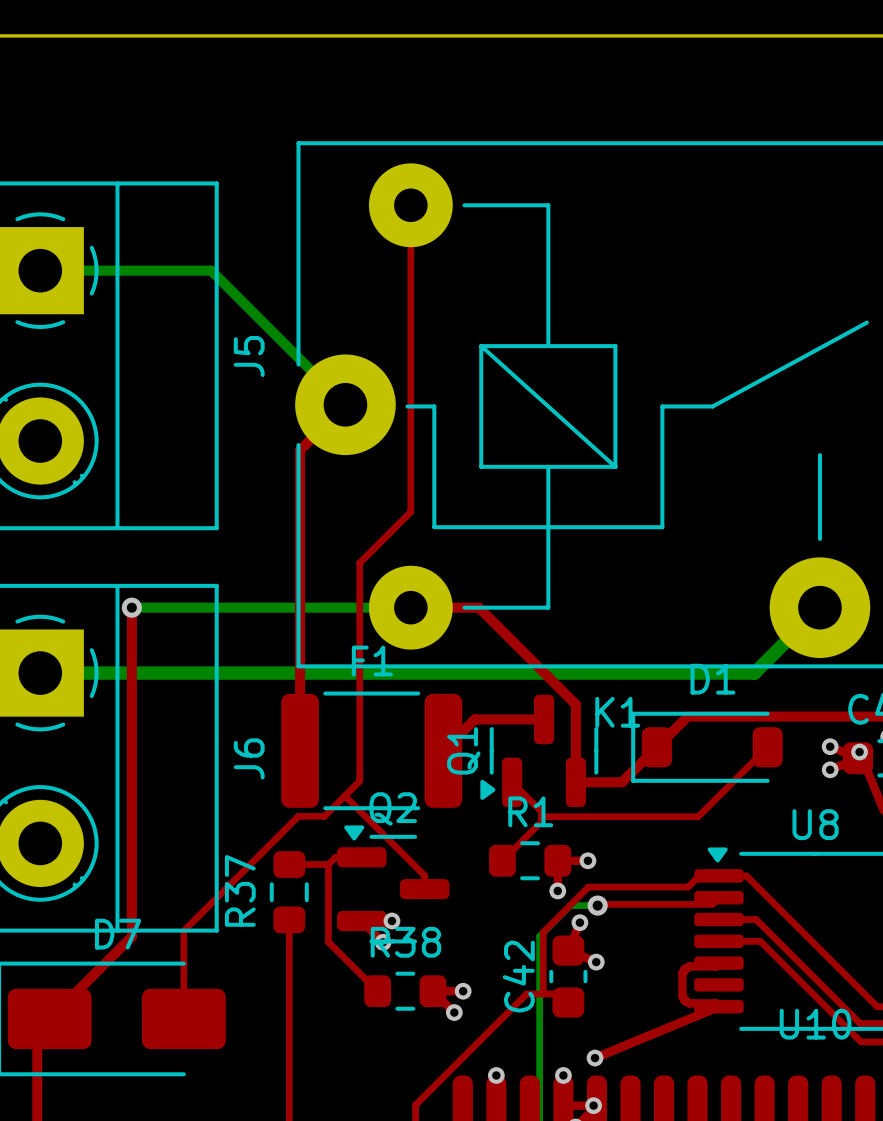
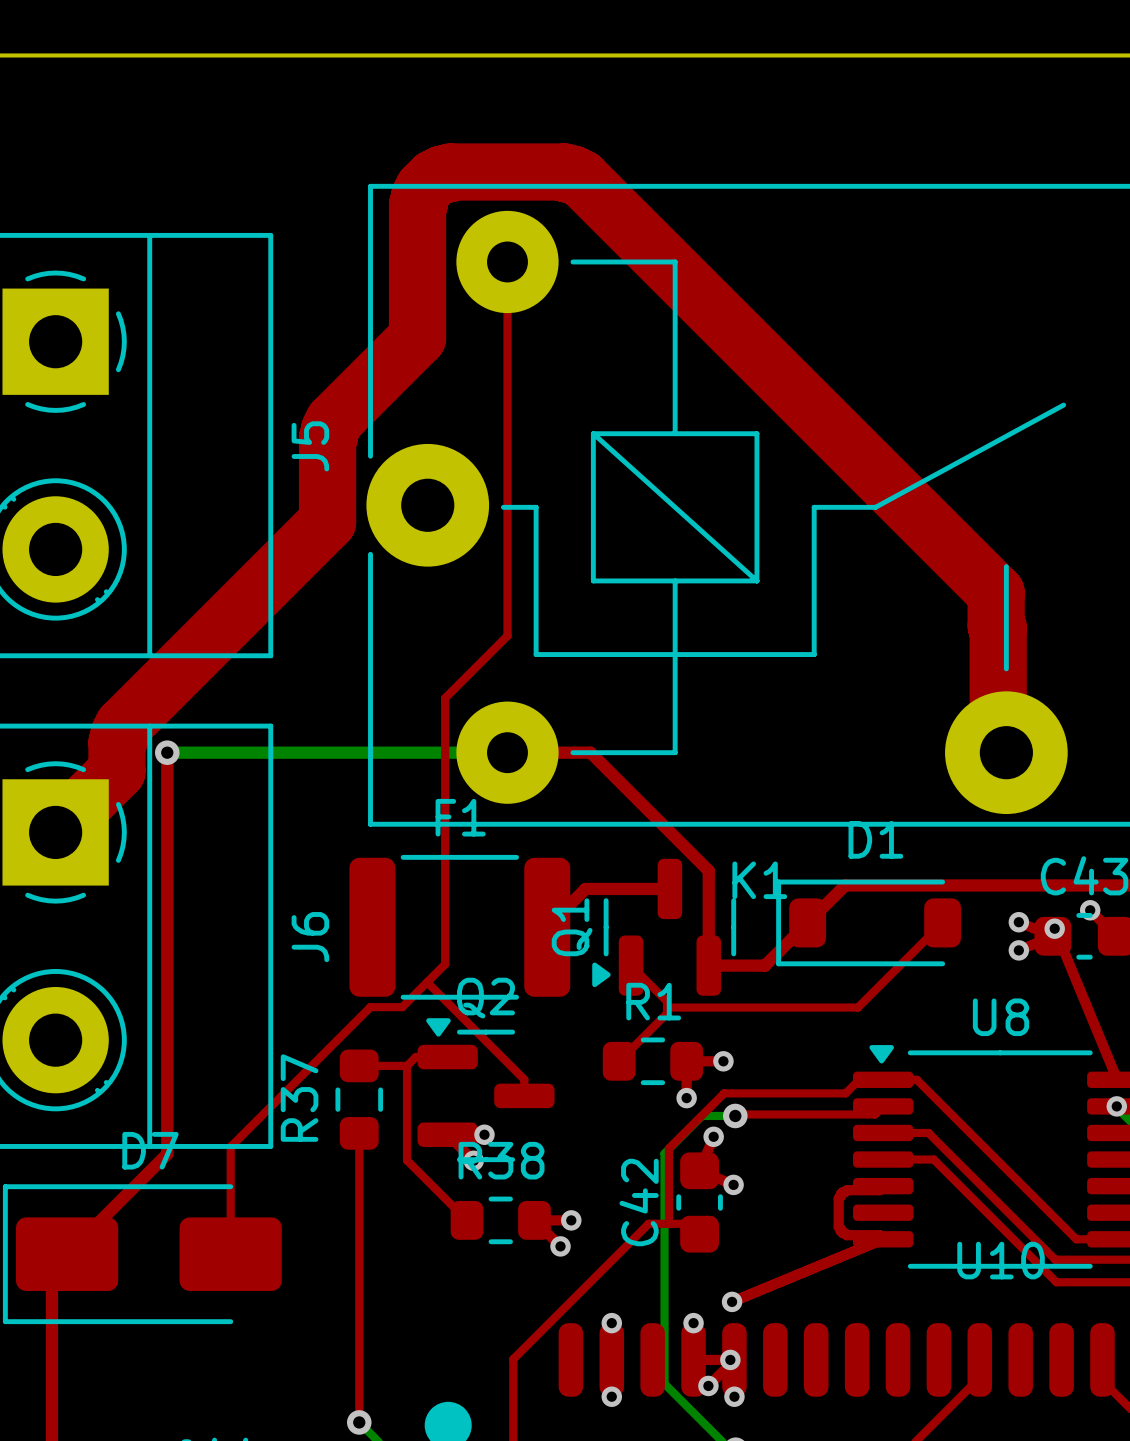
bottom track: (40, 270) (211, 270) (345, 404) -> none
top track: (345, 404) (300, 450) (300, 750) -> none
top track: none -> (1006, 752) (998, 744) (998, 627) (996, 625) (996, 593) (581, 178) (564, 172) (450, 172) (433, 178) (423, 188) (417, 204) (417, 337) (333, 421) (329, 429) (327, 437) (327, 521) (123, 726) (116, 742) (116, 771) (55, 832)
bottom track: (819, 607) (754, 673) (40, 673) -> none

